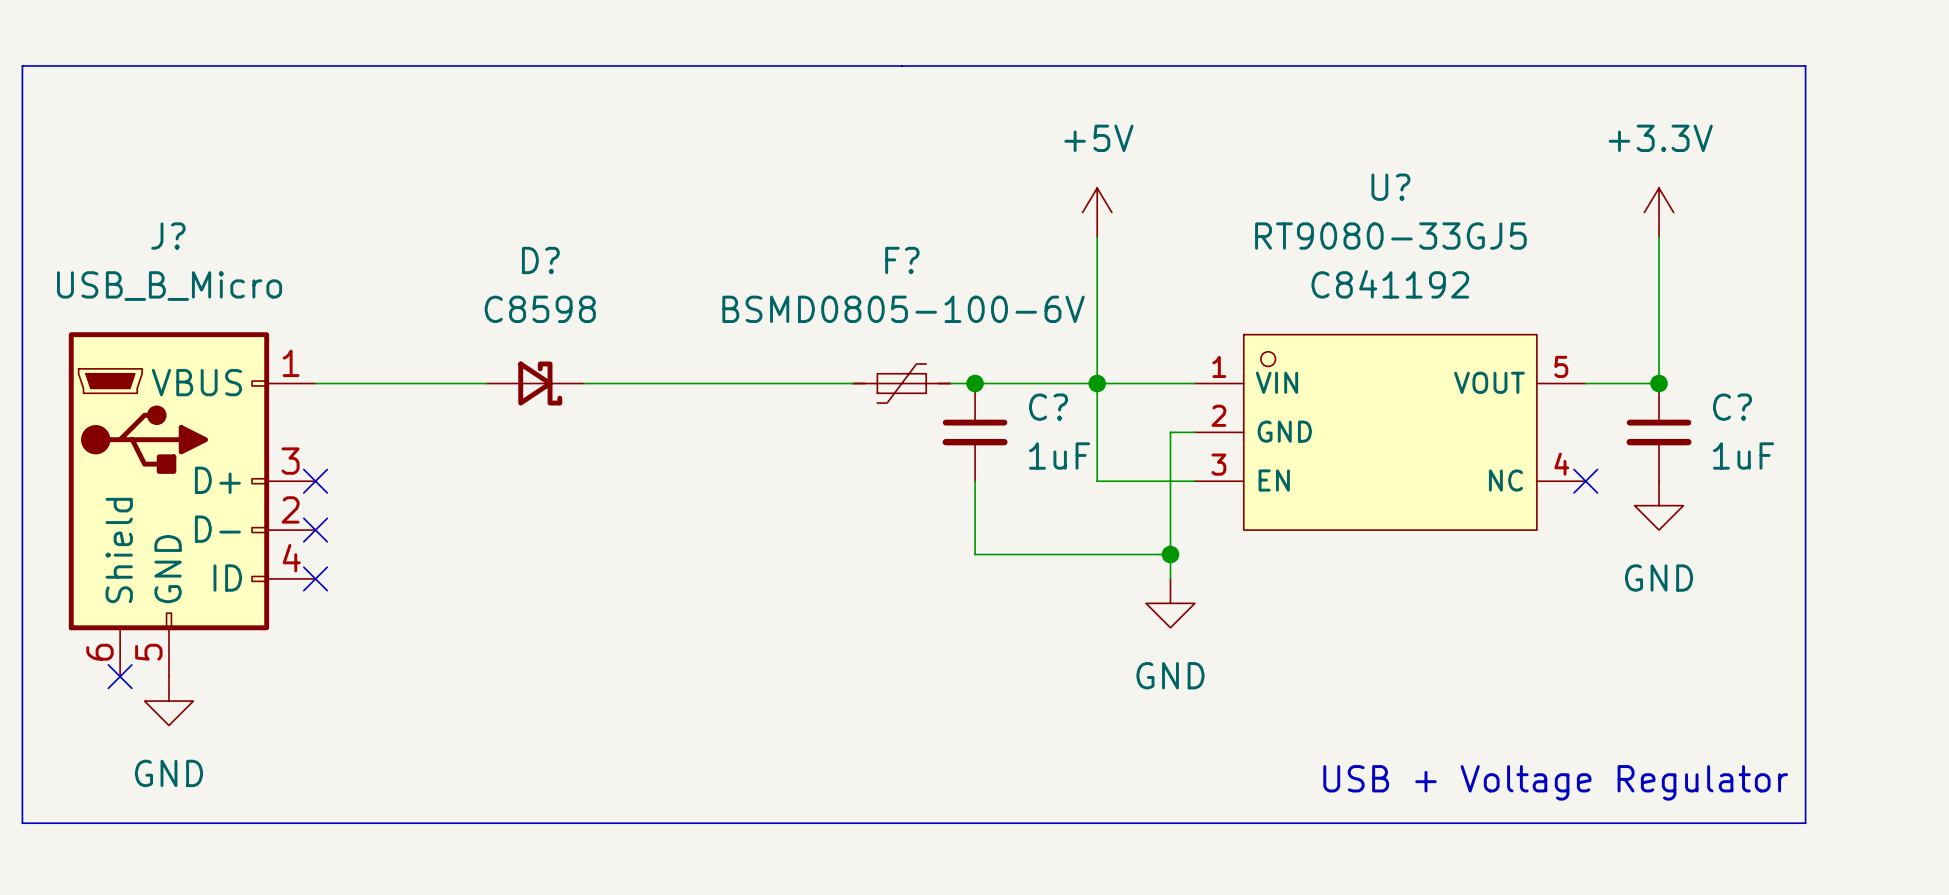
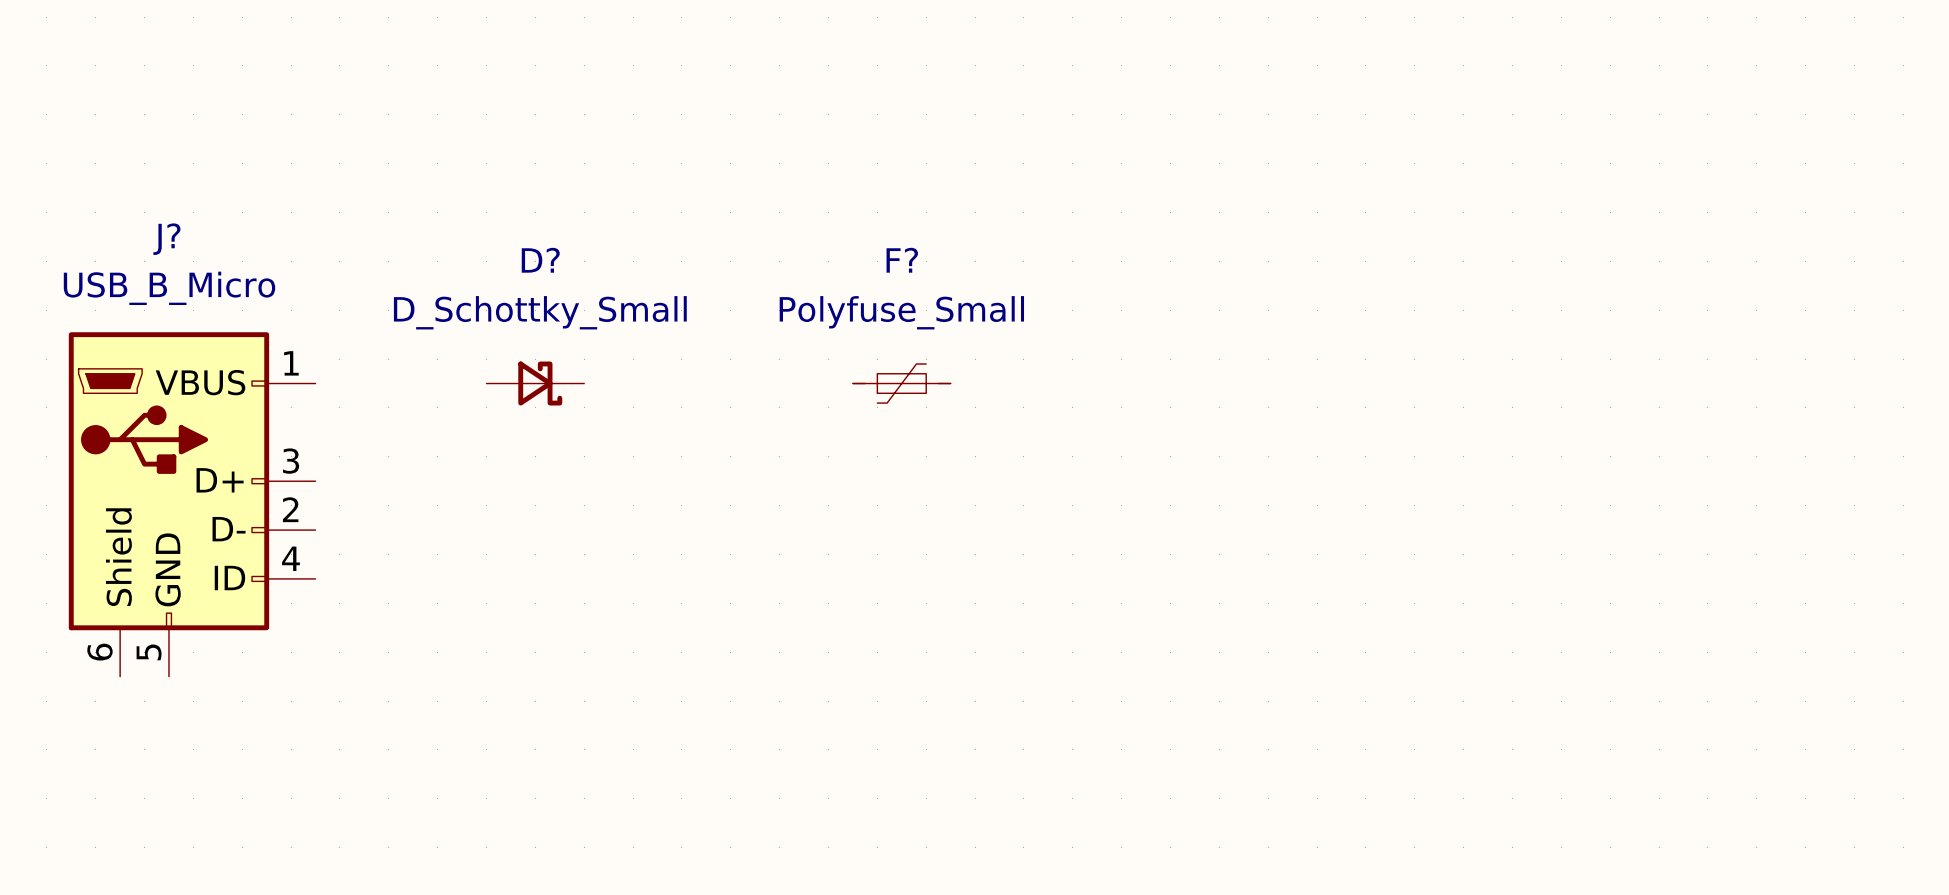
line: (22, 65) (1805, 65) (1805, 823) (22, 823) (22, 65) -> none
power symbol: +5V (1097, 212) -> none
power symbol: +3.3V (1659, 212) -> none
wire: (1097, 236) (1097, 481) (1194, 481) -> none
wire: (1659, 236) (1659, 383) (1585, 383) -> none
D? value: C8598 (540, 309) -> D_Schottky_Small (540, 312)
F? value: BSMD0805-100-6V (903, 309) -> Polyfuse_Small (901, 312)
wire: (315, 383) (486, 383) -> none
wire: (584, 383) (852, 383) -> none
wire: (950, 383) (1194, 383) -> none
junction: (975, 383) -> none
junction: (1097, 383) -> none
junction: (1659, 383) -> none
C?: 1uF (975, 432) -> none
wire: (1194, 432) (1170, 432) (1170, 578) -> none
U?: RT9080-33GJ5 (1390, 432) -> none
C?: 1uF (1659, 432) -> none
no-connect mark: (315, 481) -> none
wire: (975, 481) (975, 554) (1170, 554) -> none
no-connect mark: (1585, 481) -> none
power symbol: GND (1659, 505) -> none
no-connect mark: (315, 530) -> none
junction: (1170, 554) -> none
no-connect mark: (315, 578) -> none
power symbol: GND (1170, 603) -> none
no-connect mark: (120, 676) -> none
power symbol: GND (168, 701) -> none
text: USB + Voltage Regulator (1555, 782) -> none

